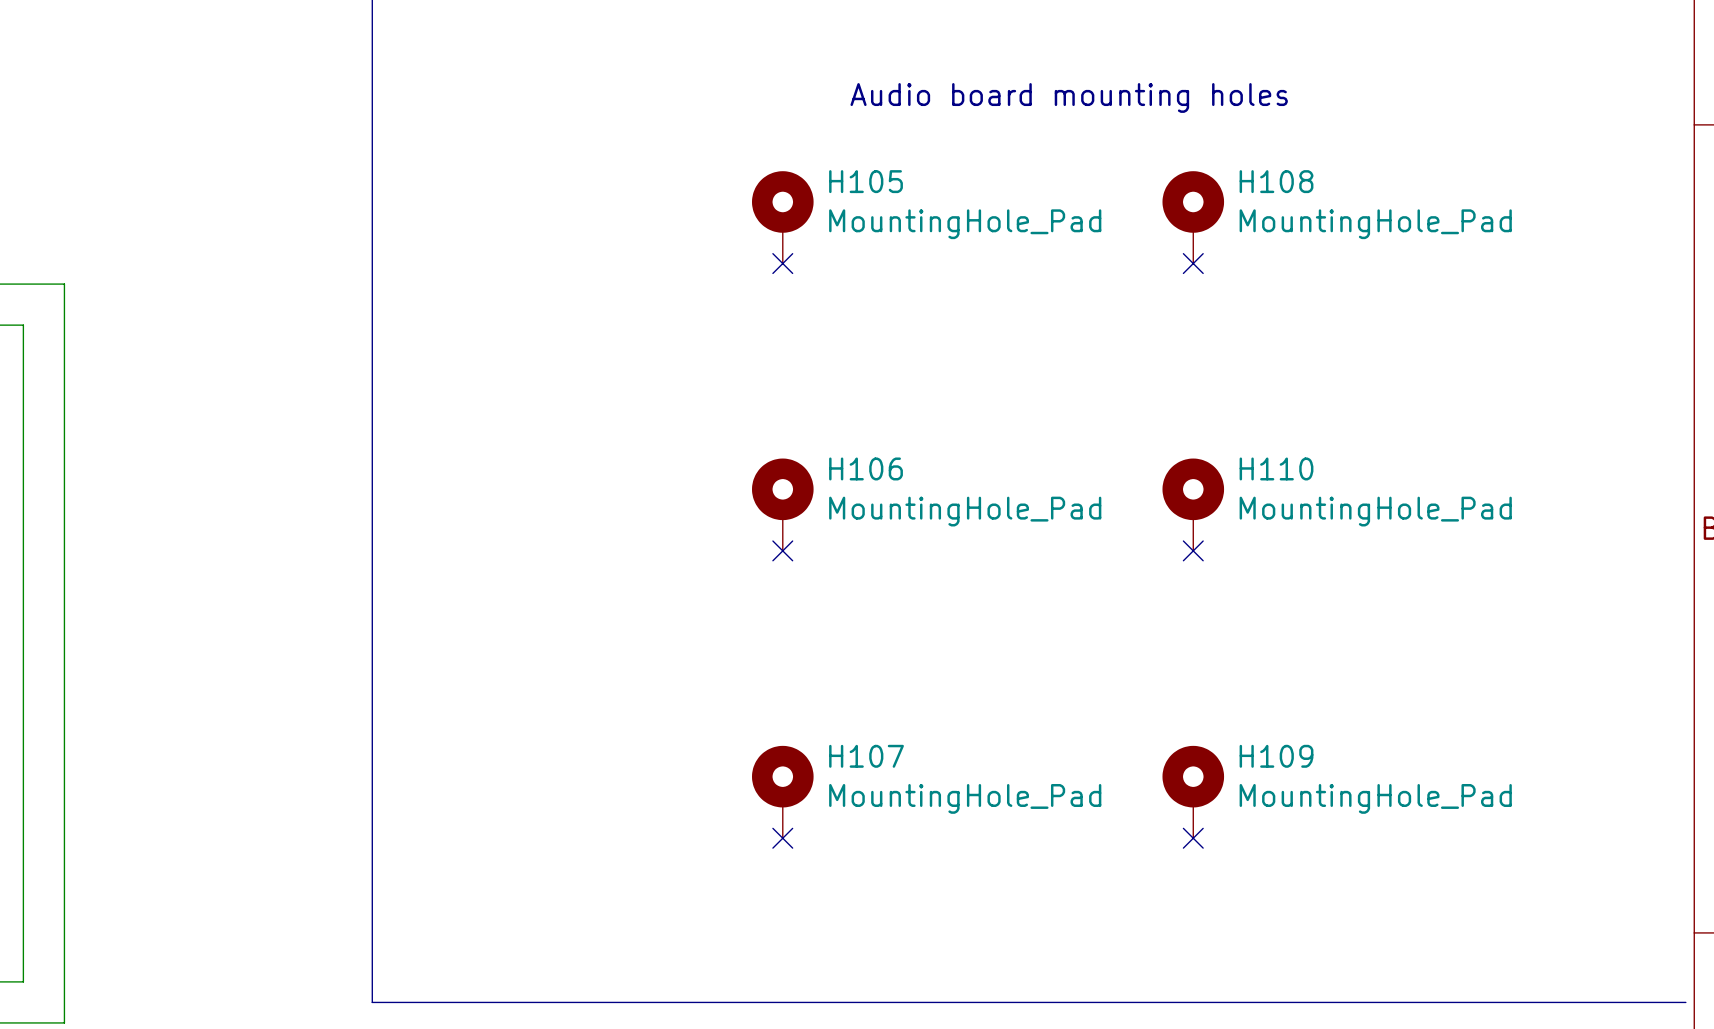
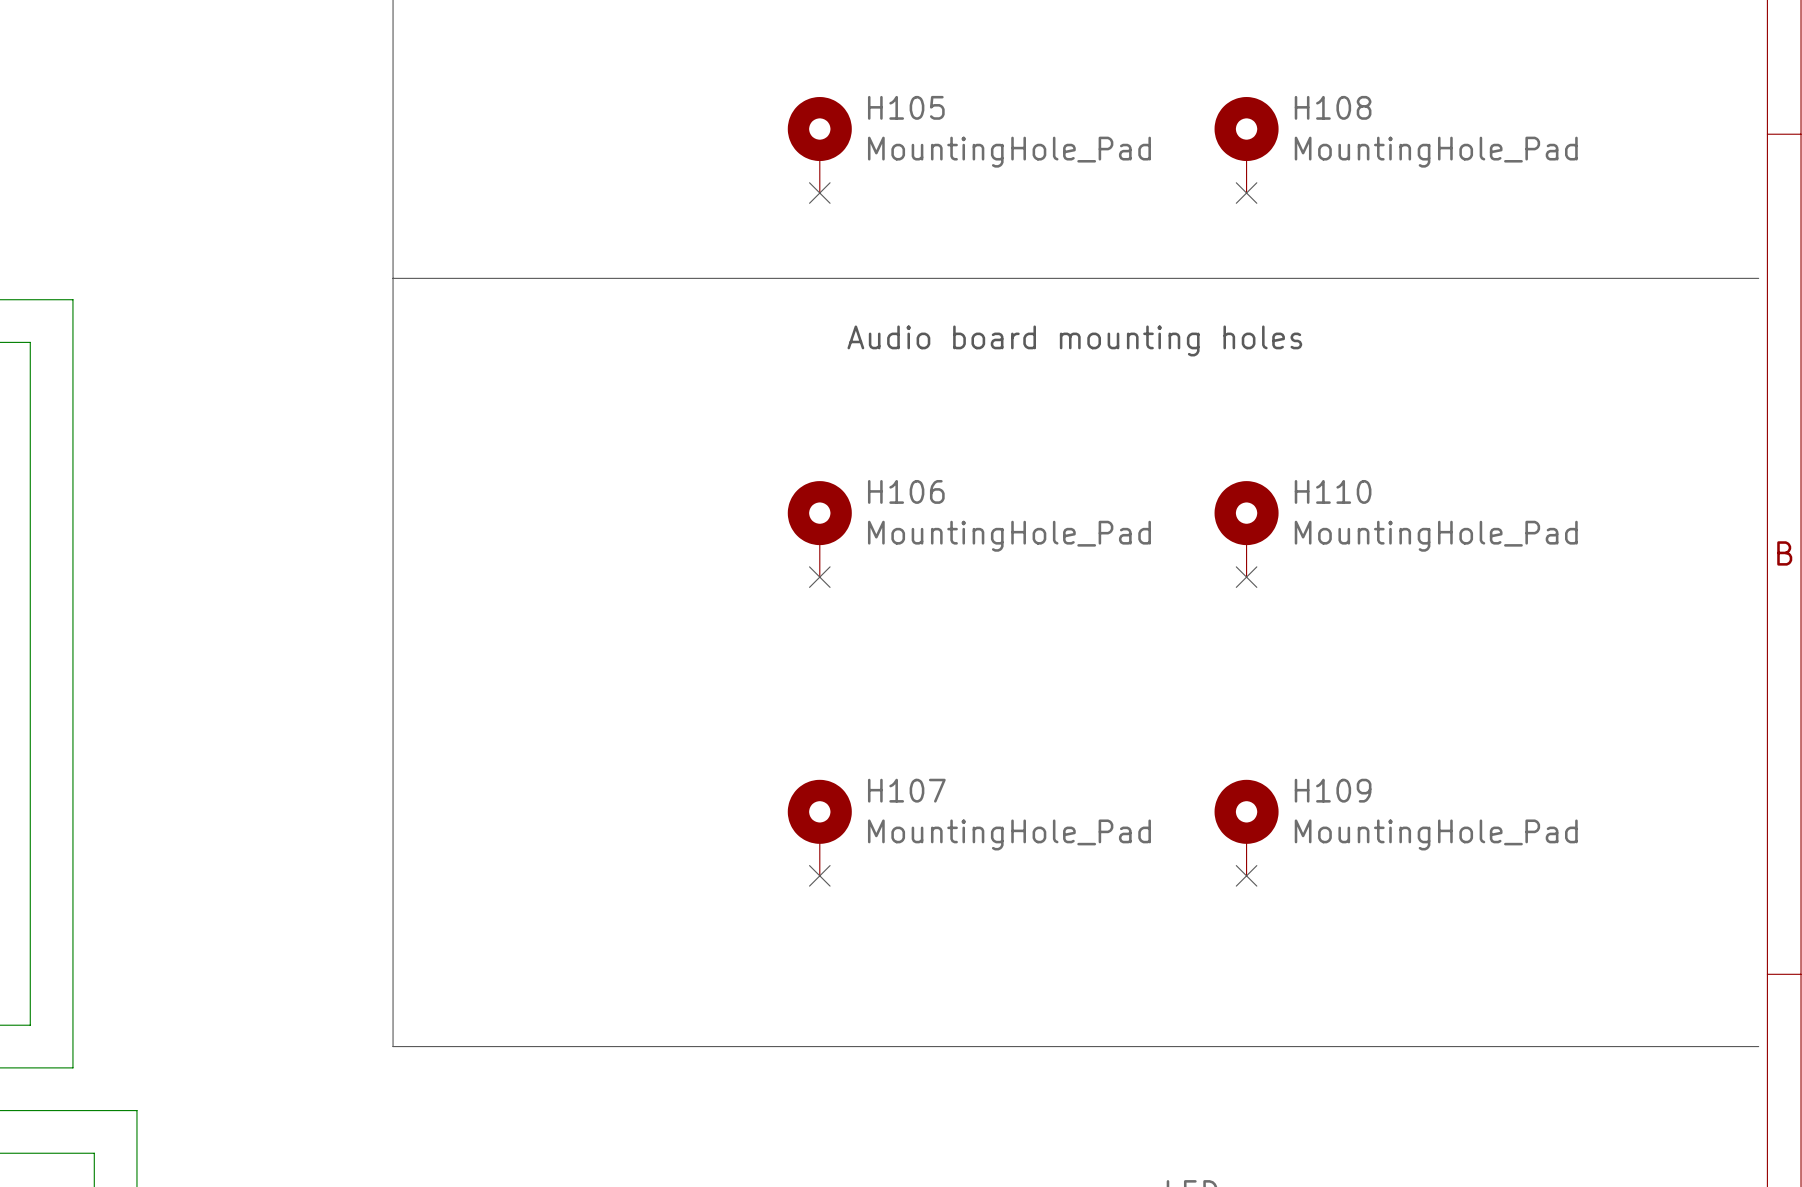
text position: Audio board mounting holes (1069, 97) -> Audio board mounting holes (1074, 340)
H105 position: (782, 217) -> (819, 145)
H108 position: (1193, 217) -> (1246, 145)
line: none -> (393, 278) (1758, 278)
no-connect mark position: (782, 263) -> (819, 193)
no-connect mark position: (1193, 263) -> (1246, 193)

